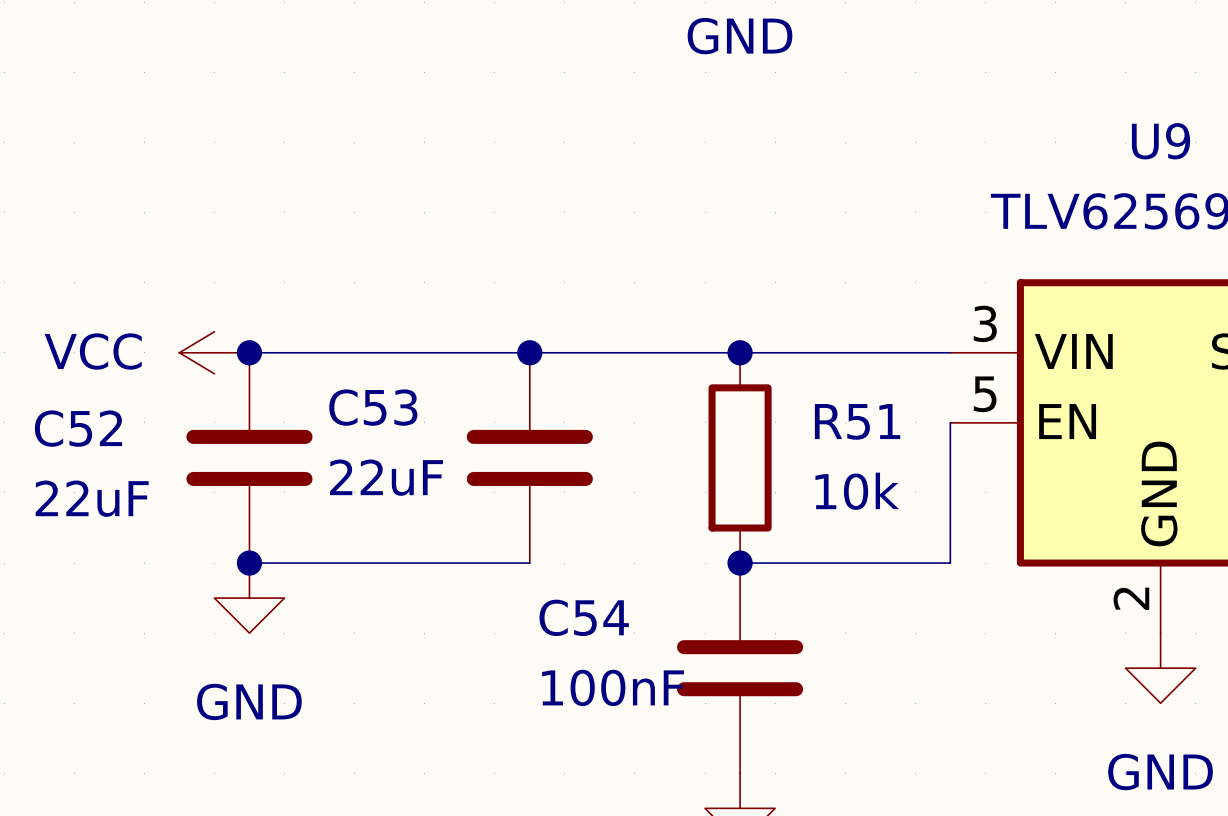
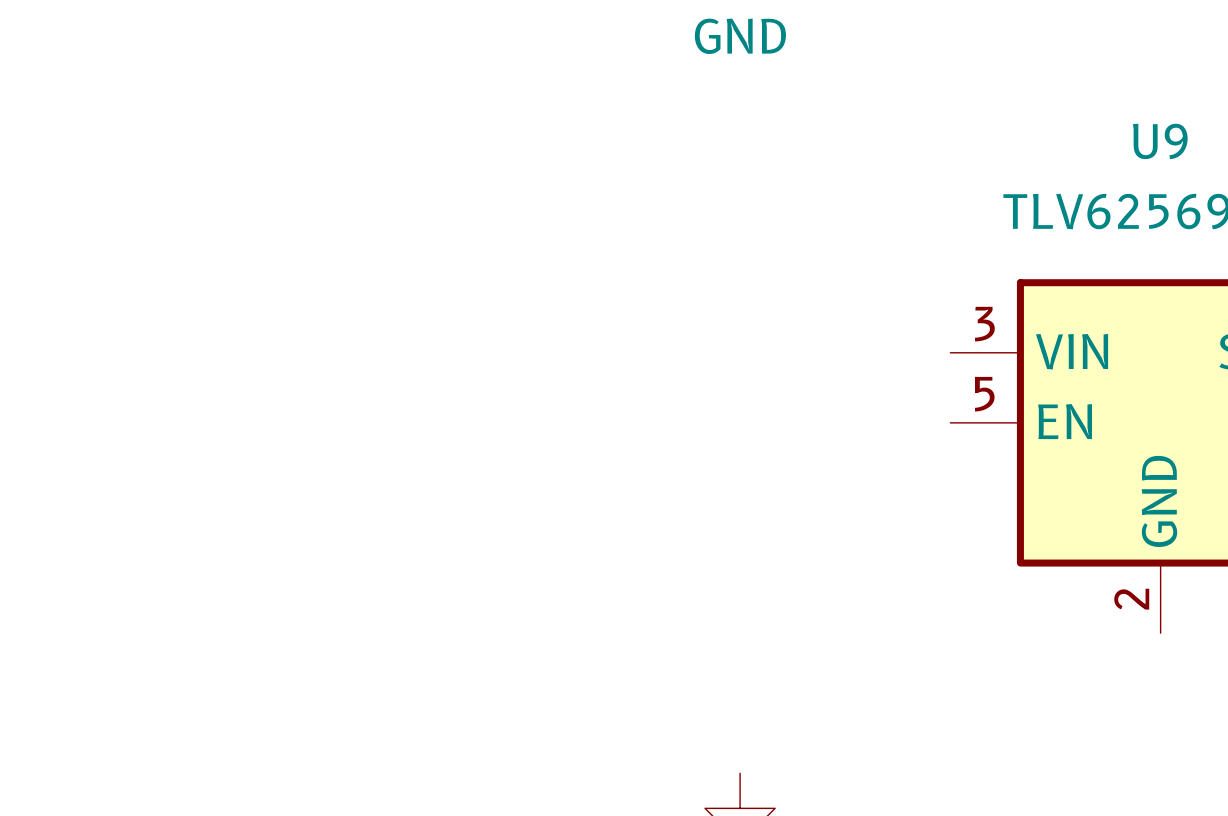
power symbol: VCC (214, 352) -> none
wire: (249, 352) (950, 352) -> none
junction: (249, 352) -> none
junction: (529, 352) -> none
junction: (740, 352) -> none
wire: (950, 422) (950, 563) (740, 563) -> none
C52: 22uF (249, 457) -> none
C53: 22uF (529, 457) -> none
R51: 10k (740, 457) -> none
wire: (249, 563) (529, 563) -> none
junction: (249, 563) -> none
junction: (740, 563) -> none
power symbol: GND (249, 598) -> none
C54: 100nF (740, 668) -> none
power symbol: GND (1160, 668) -> none

